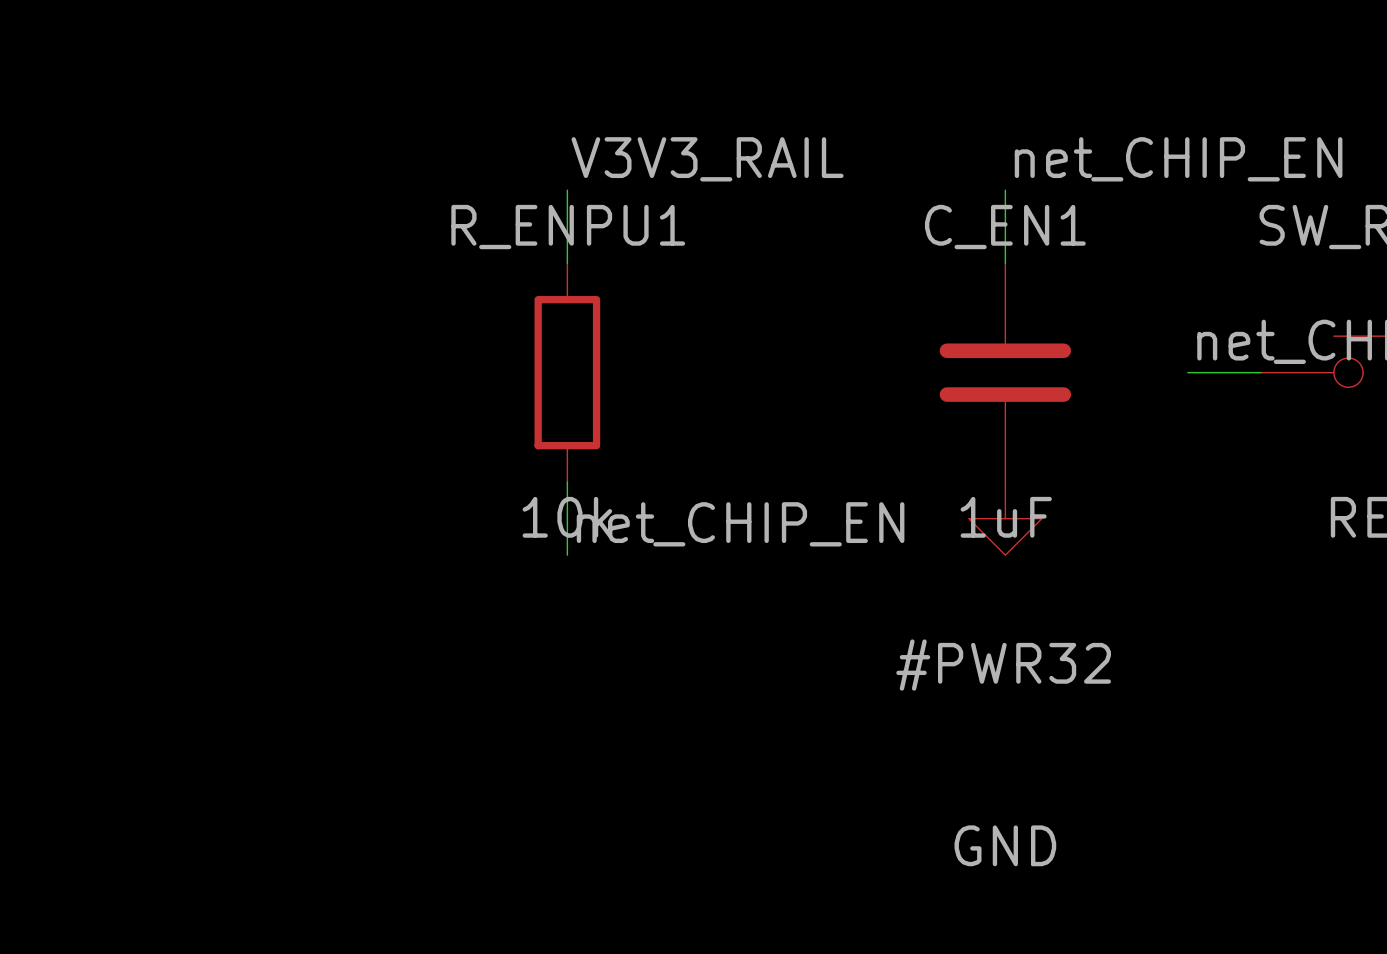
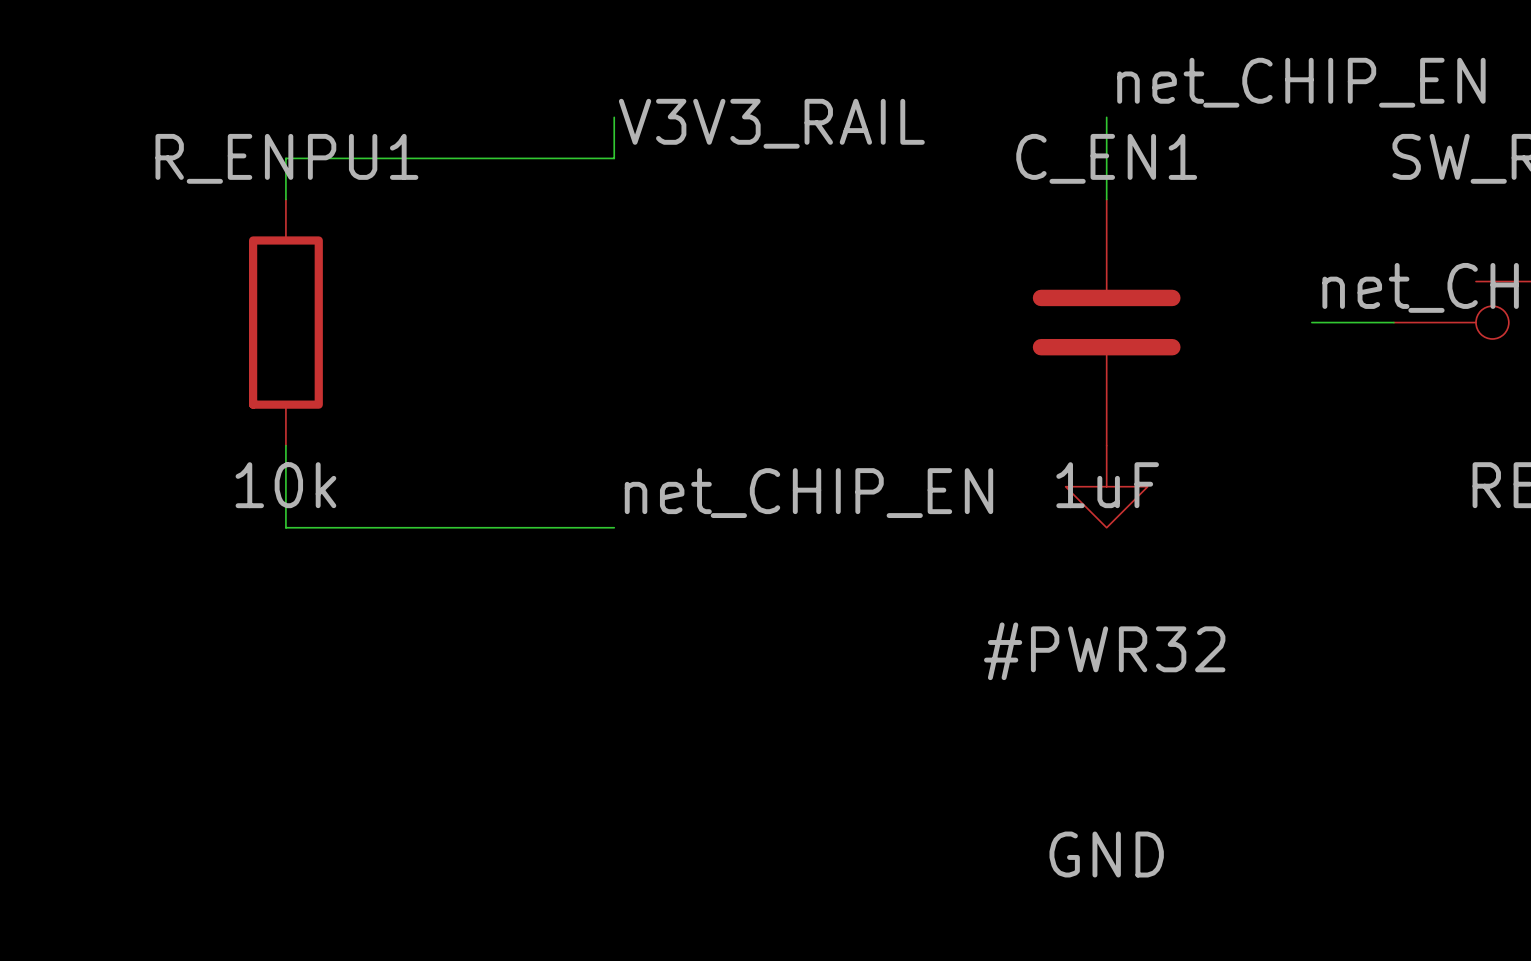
label position: V3V3_RAIL (707, 159) -> V3V3_RAIL (771, 123)
wire: (567, 226) (567, 263) -> (614, 158) (285, 158) (285, 199)
R_ENPU1 position: (567, 372) -> (285, 322)
wire: (567, 482) (567, 555) -> (285, 445) (285, 527) (614, 527)

